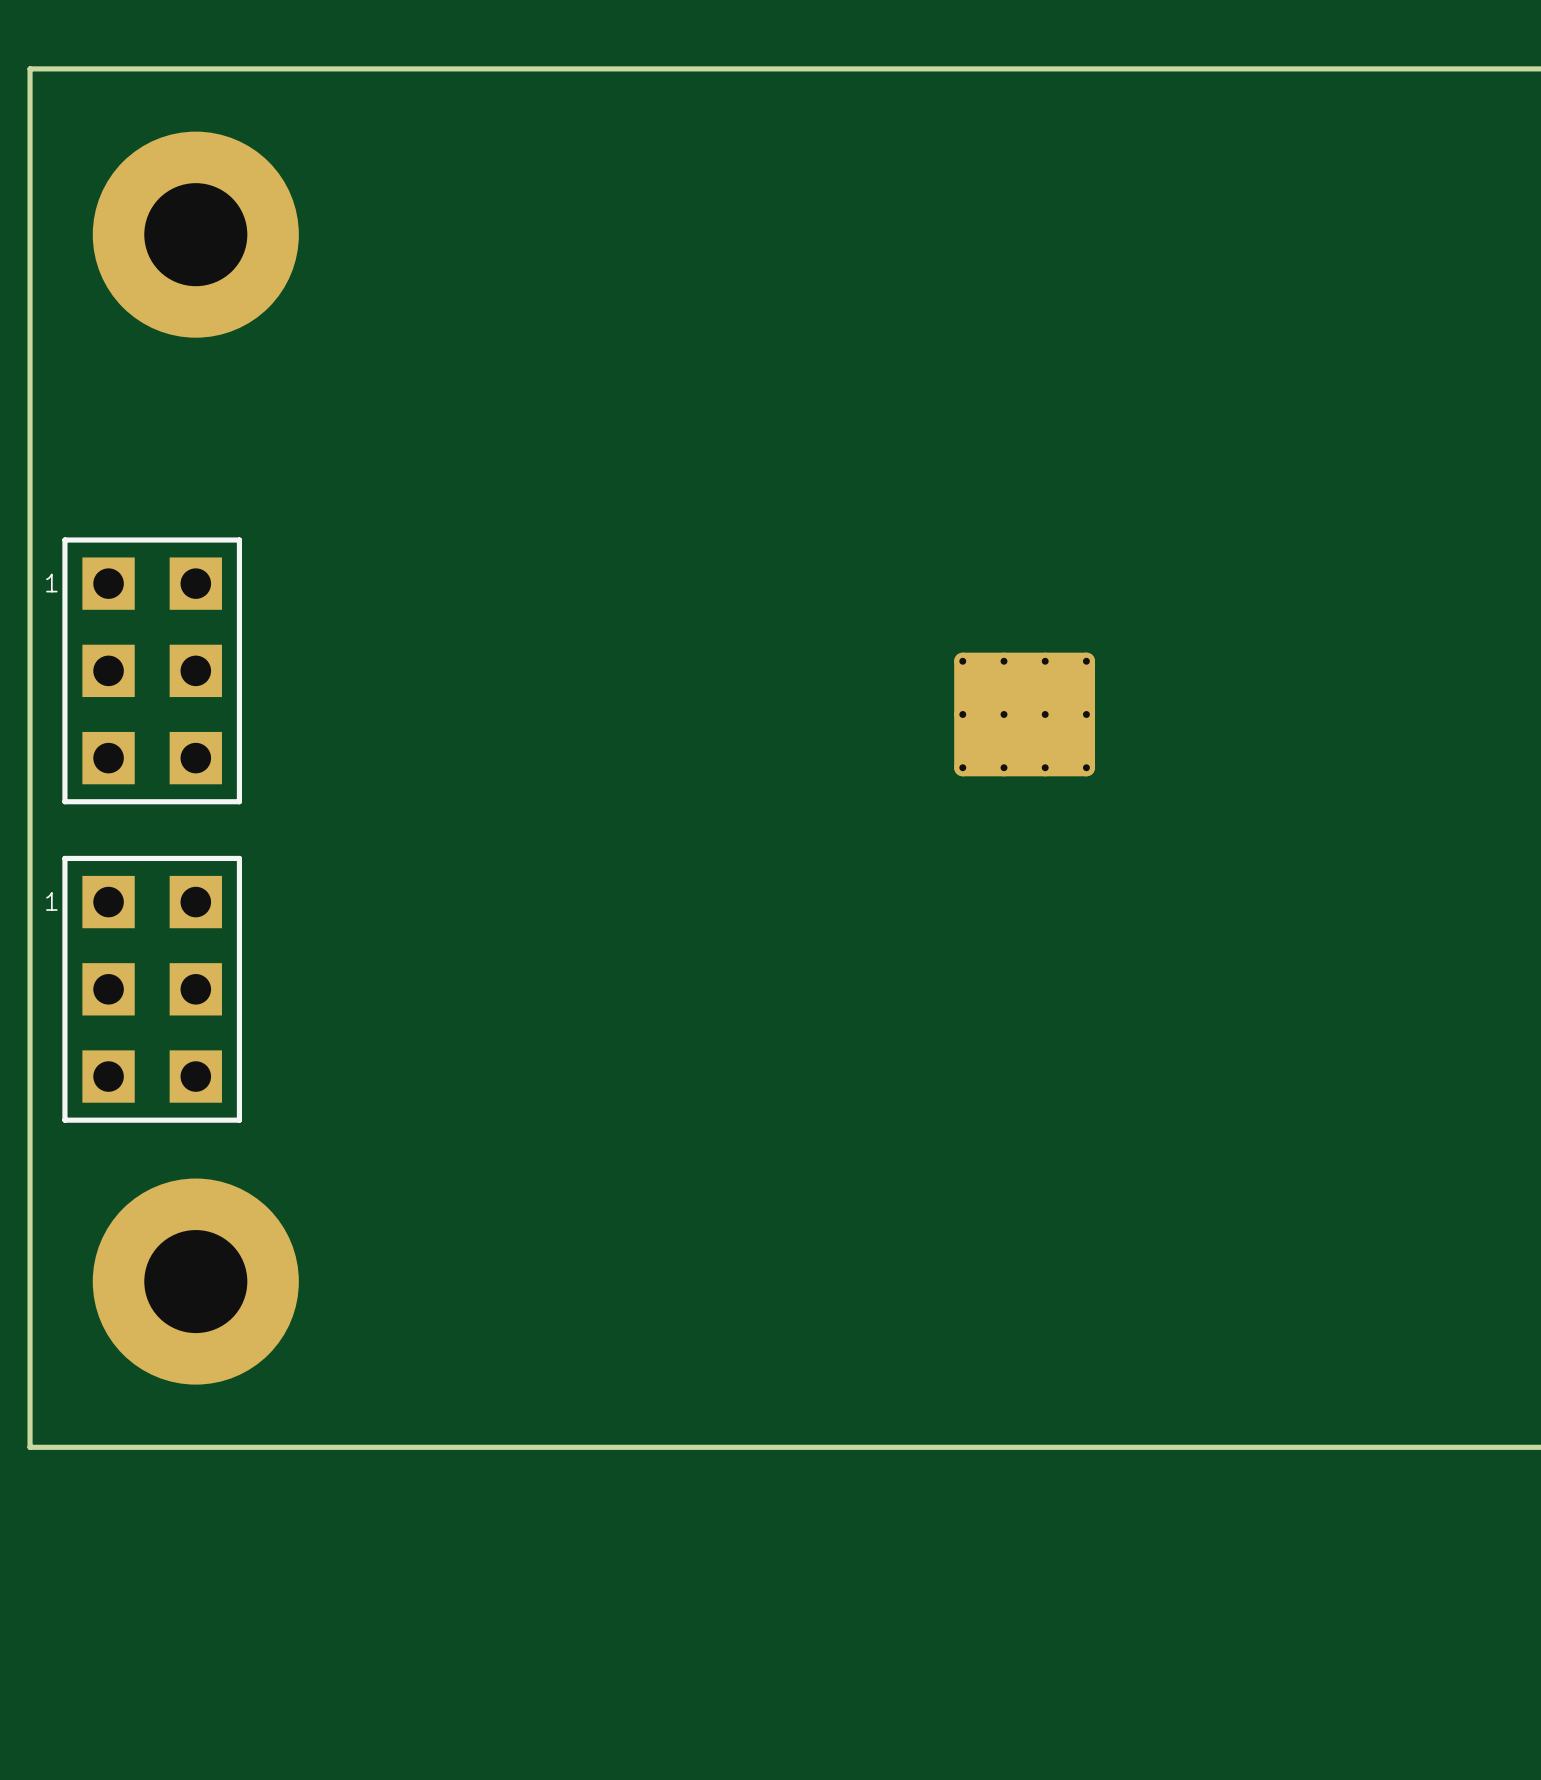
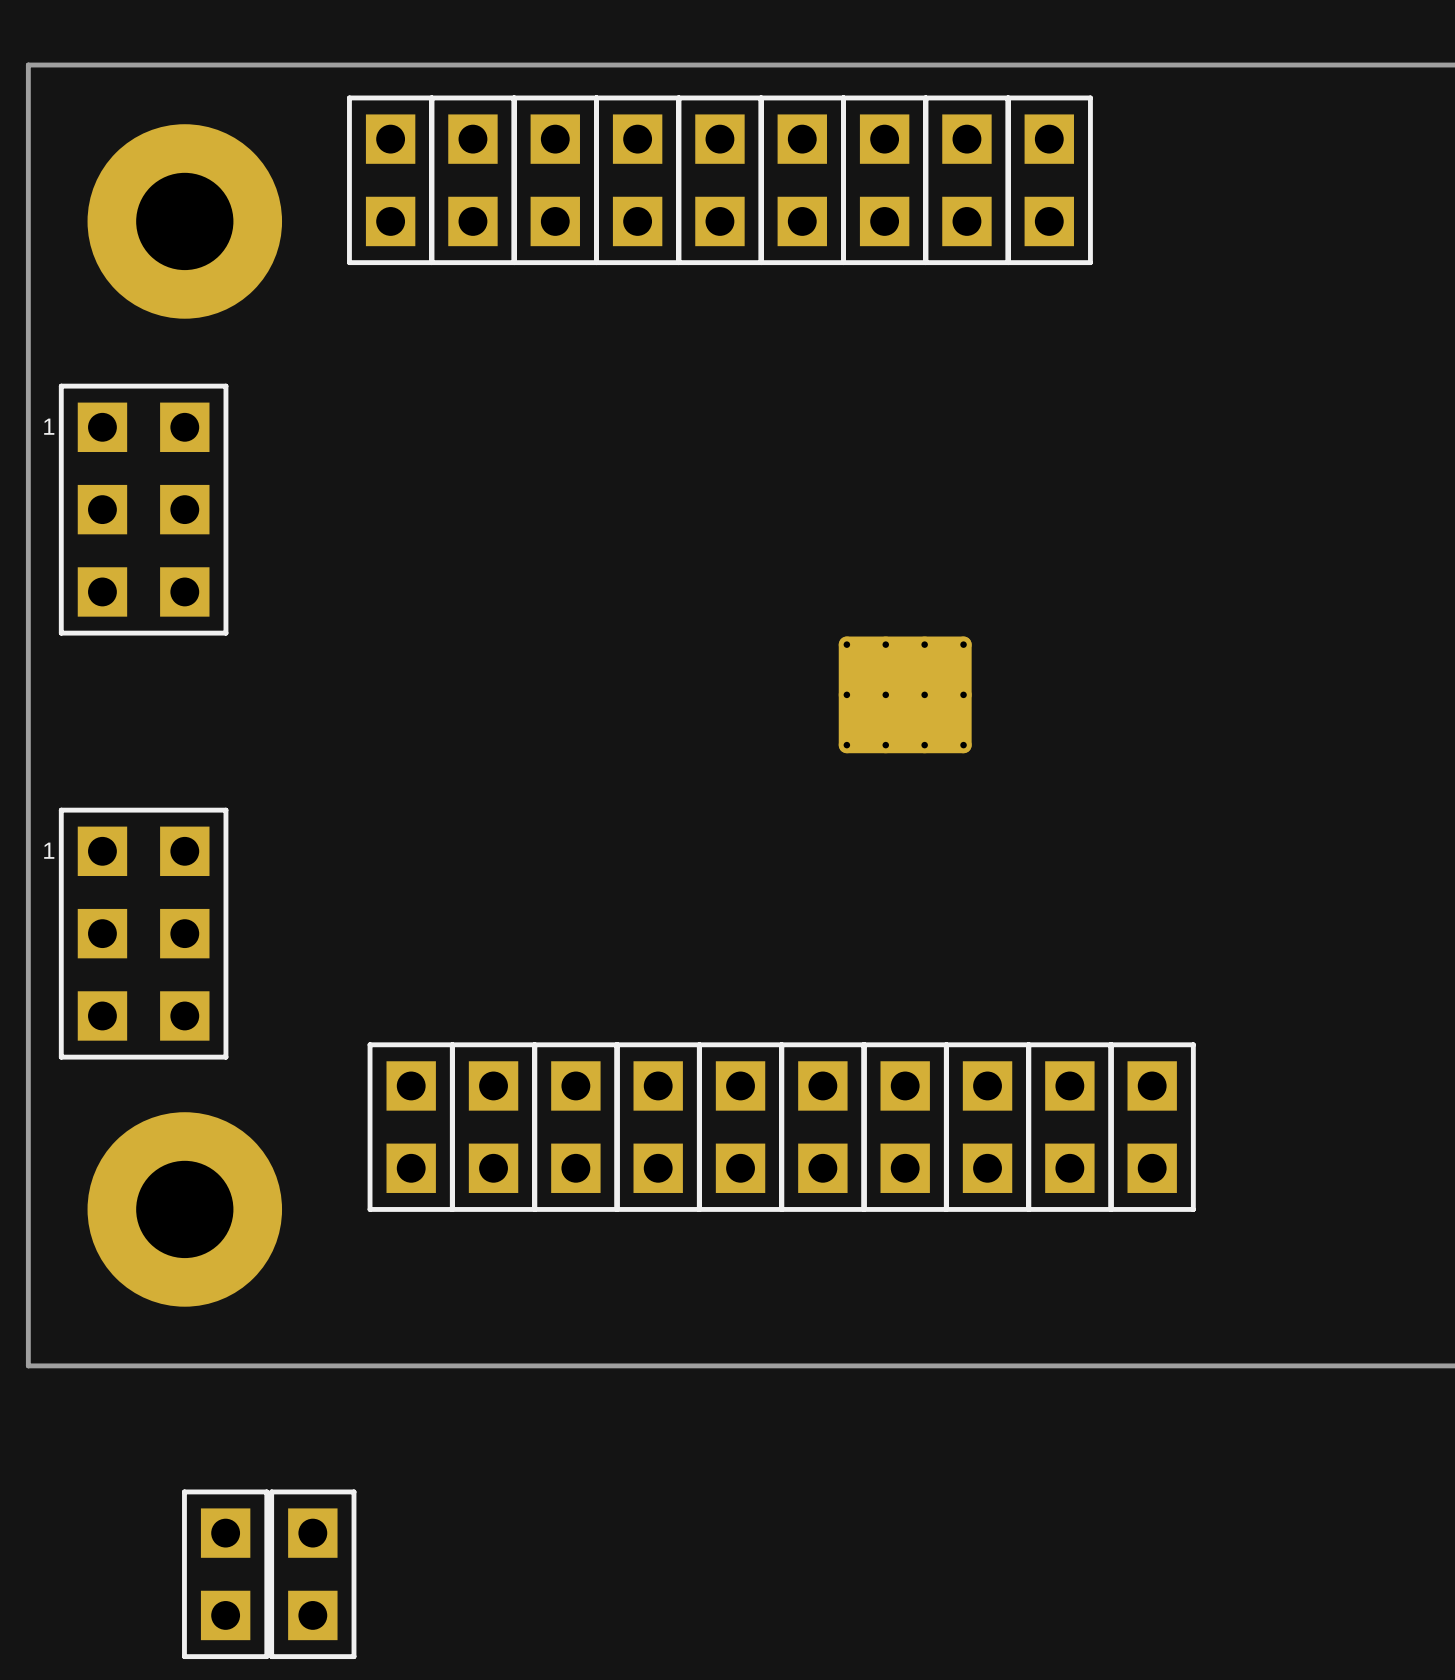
part: none -> (390, 180)
part: none -> (472, 180)
part: none -> (555, 180)
part: none -> (637, 180)
part: none -> (719, 180)
part: none -> (802, 180)
part: none -> (884, 180)
part: none -> (966, 180)
part: none -> (1049, 180)
part position: (152, 670) -> (143, 509)
part position: (1024, 714) -> (905, 694)
part: none -> (411, 1127)
part: none -> (493, 1127)
part: none -> (575, 1127)
part: none -> (658, 1127)
part: none -> (740, 1127)
part: none -> (822, 1127)
part: none -> (905, 1127)
part: none -> (987, 1127)
part: none -> (1069, 1127)
part: none -> (1152, 1127)
part: none -> (225, 1574)
part: none -> (312, 1574)

